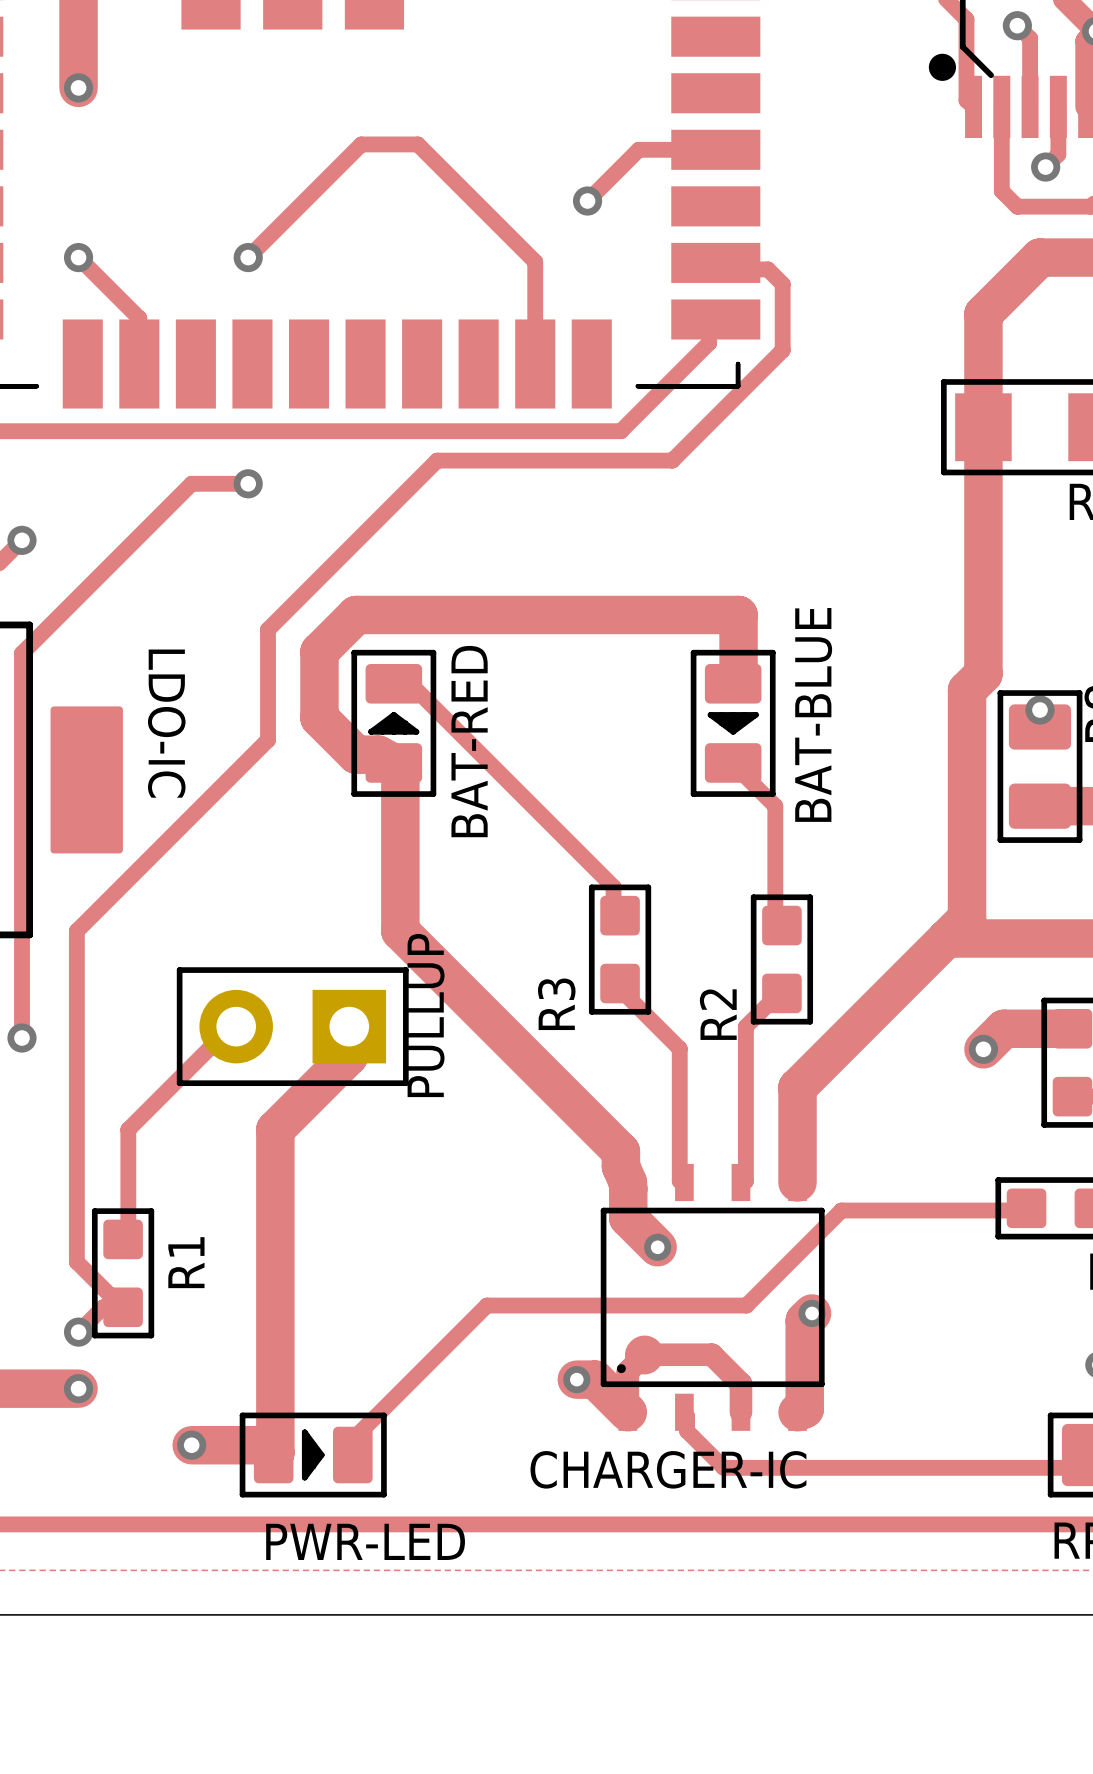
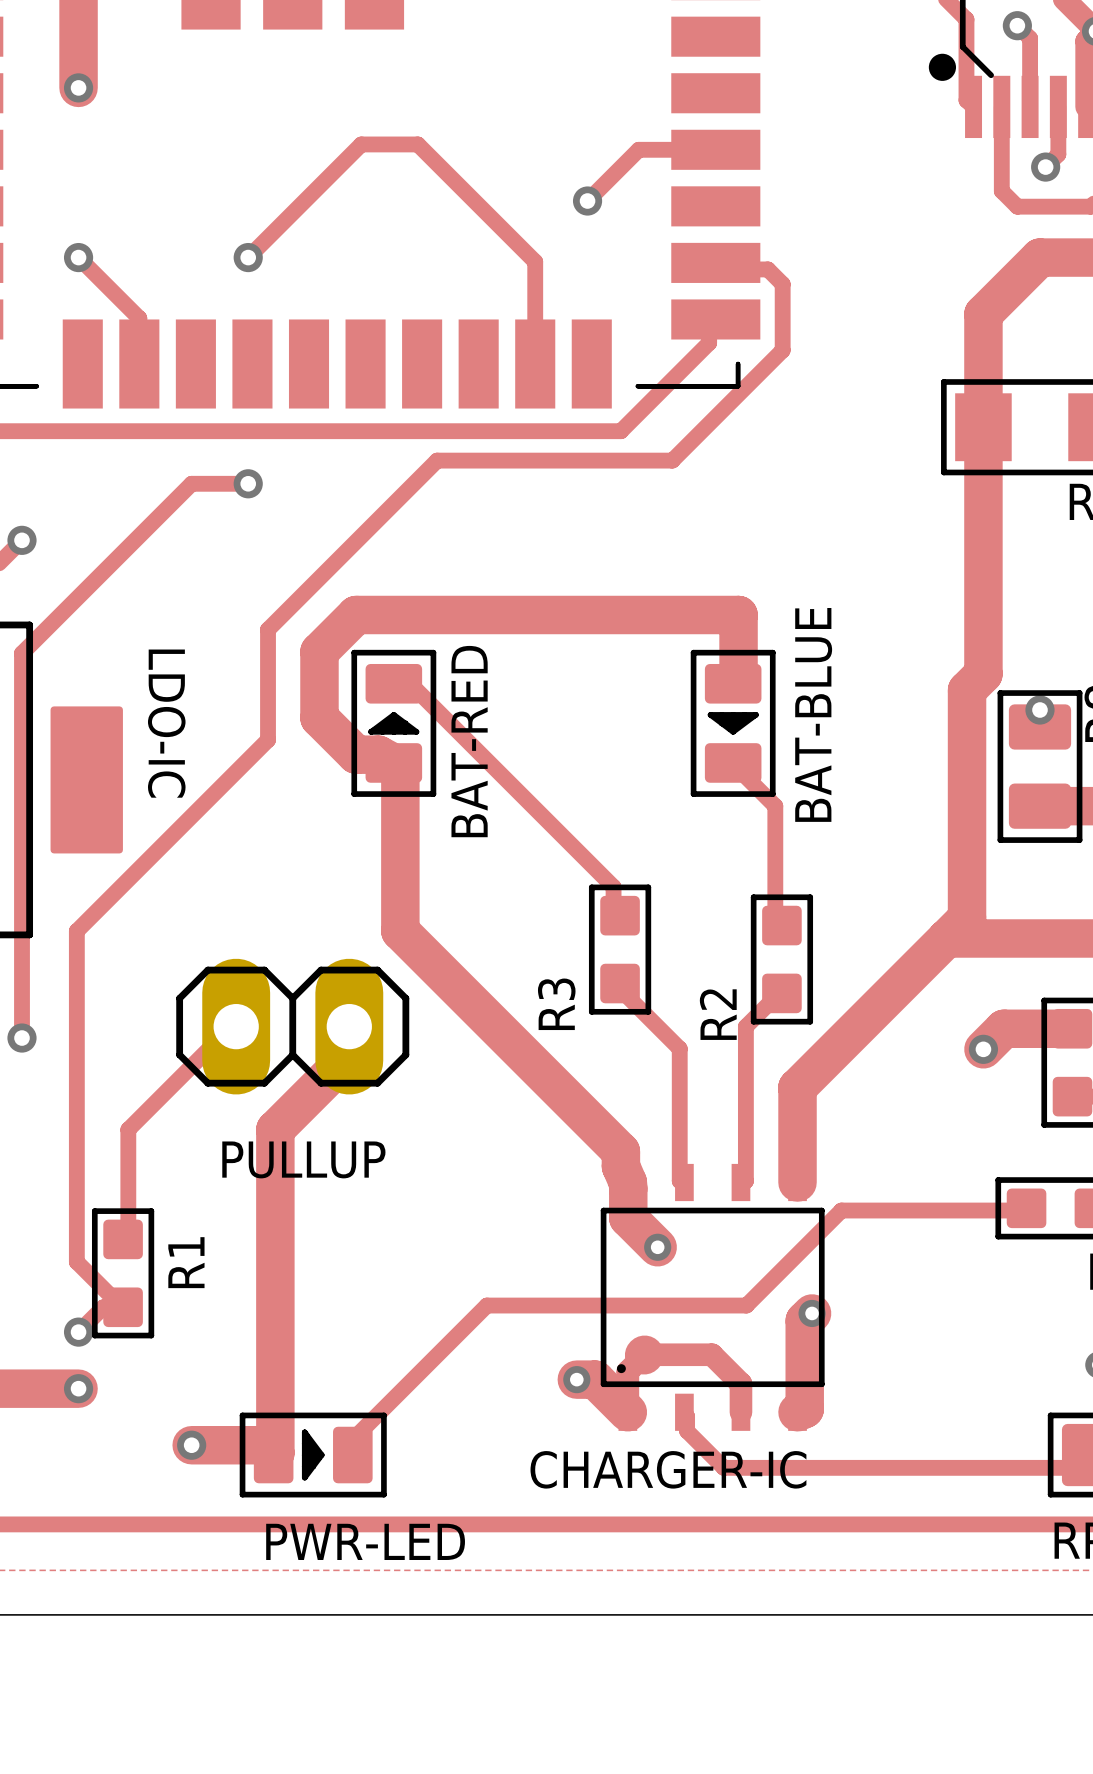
PULLUP footprint: [176, 967, 409, 1087] -> [176, 958, 410, 1095]
PULLUP name position: PULLUP (426, 1015) -> PULLUP (303, 1159)

